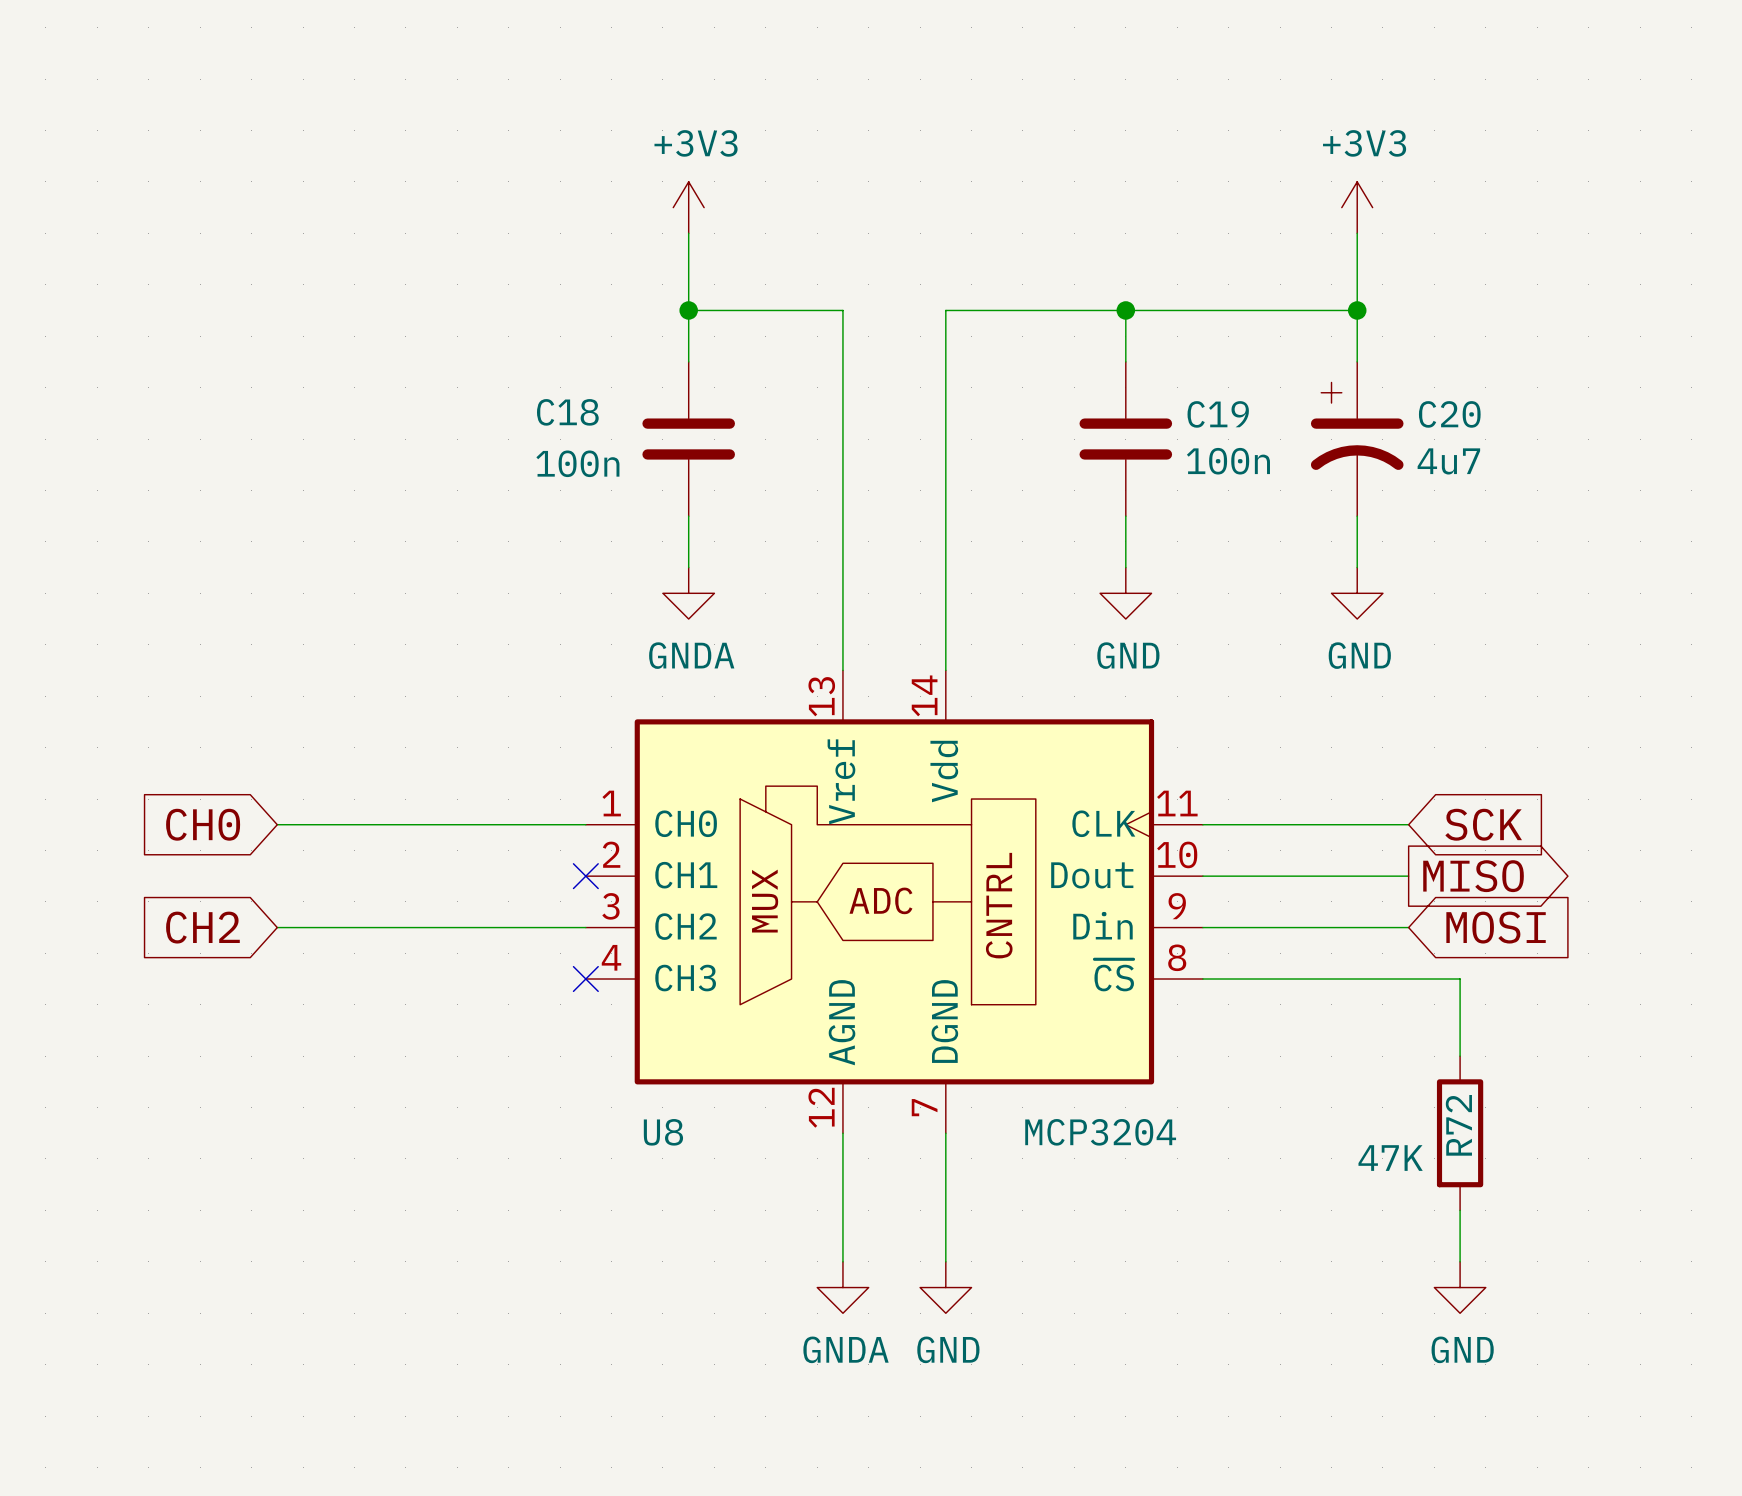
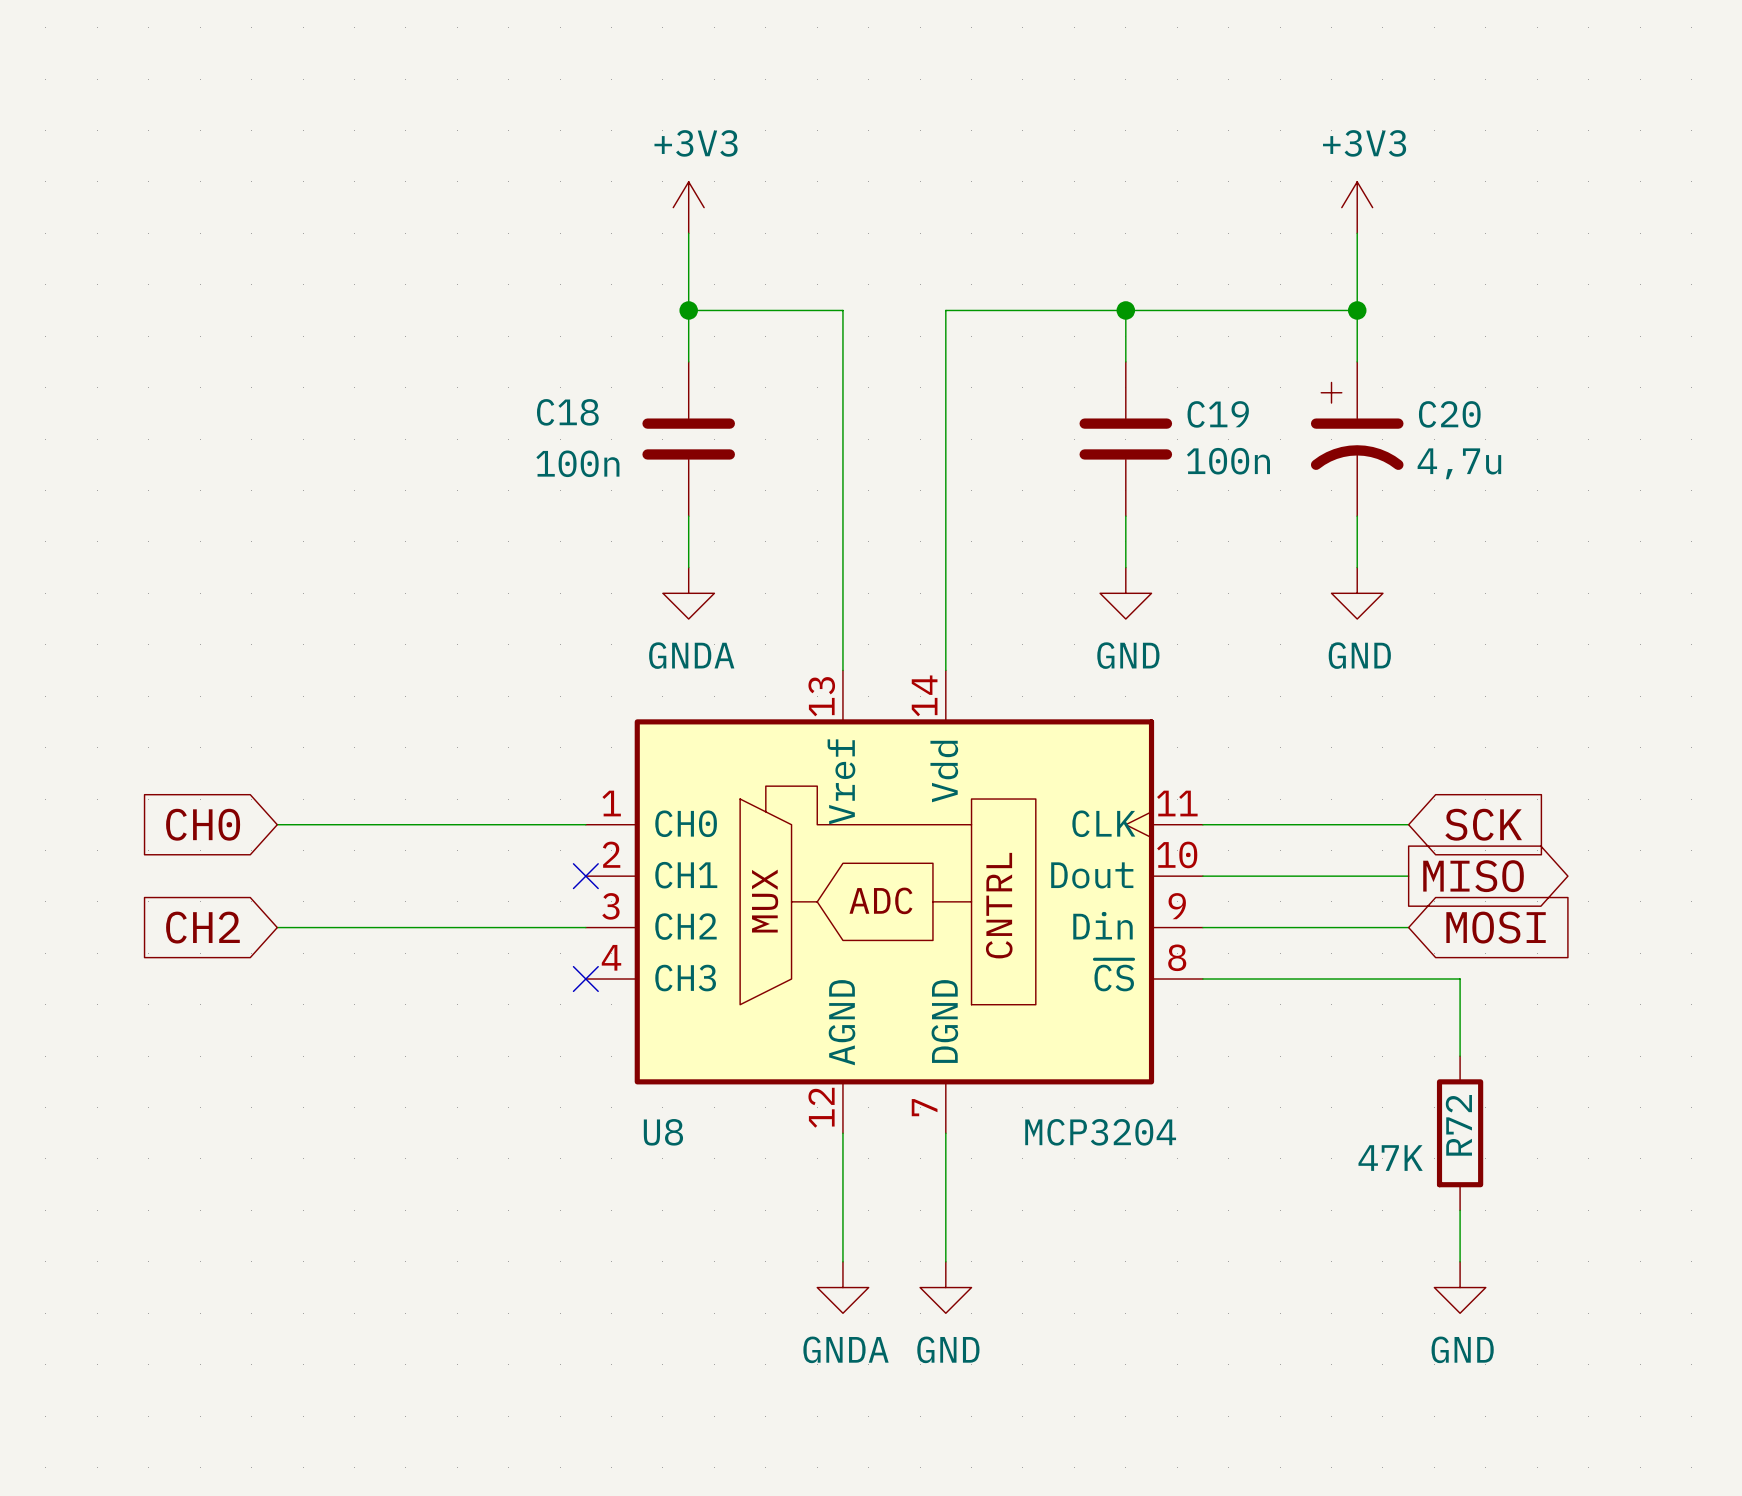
C20 value: 4u7 (1448, 461) -> 4,7u (1459, 463)

